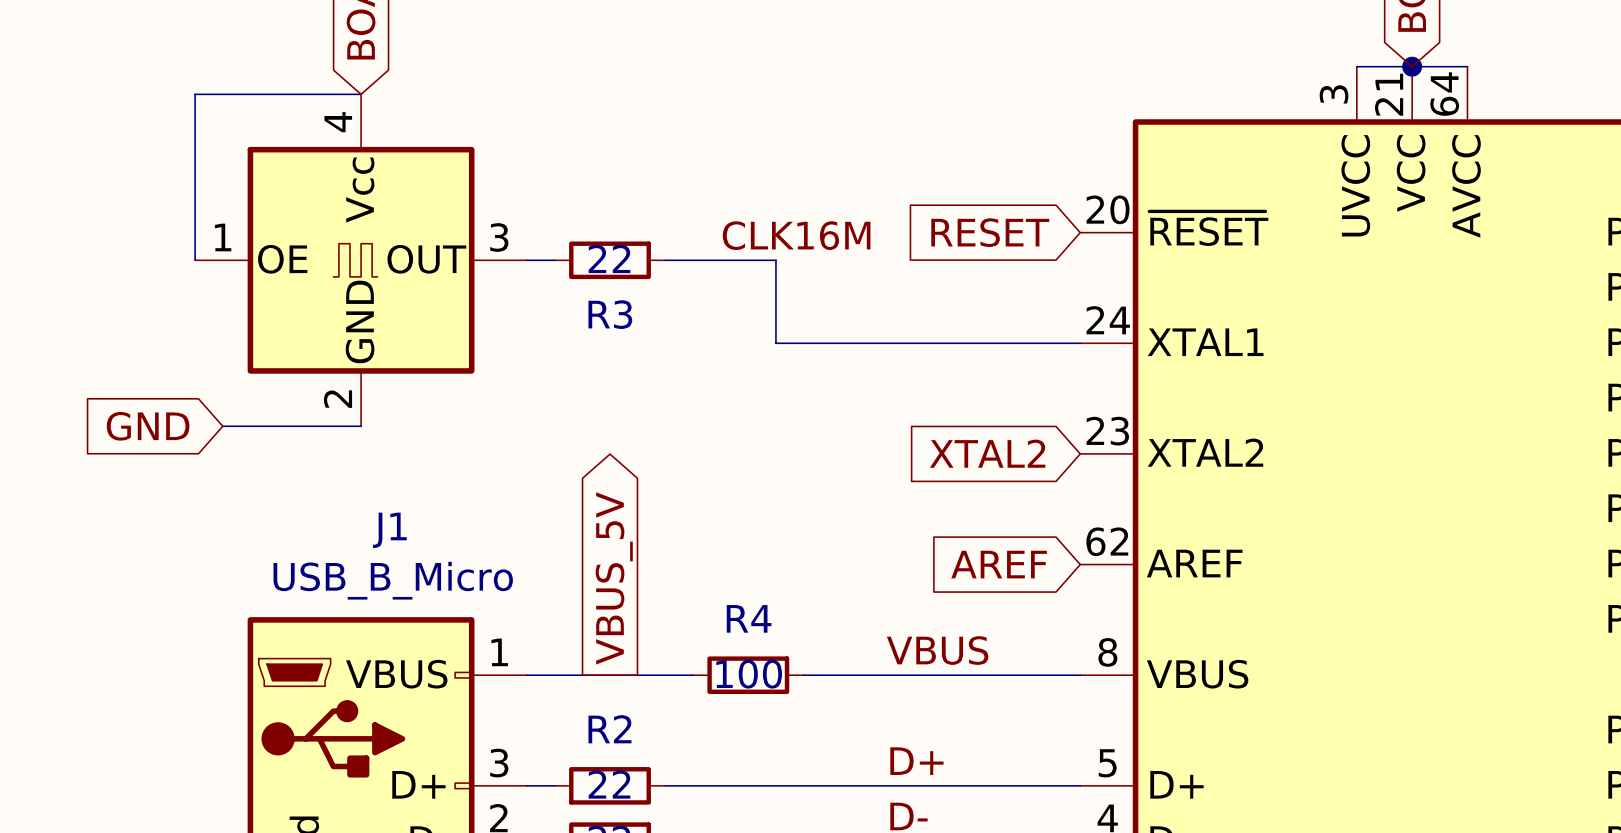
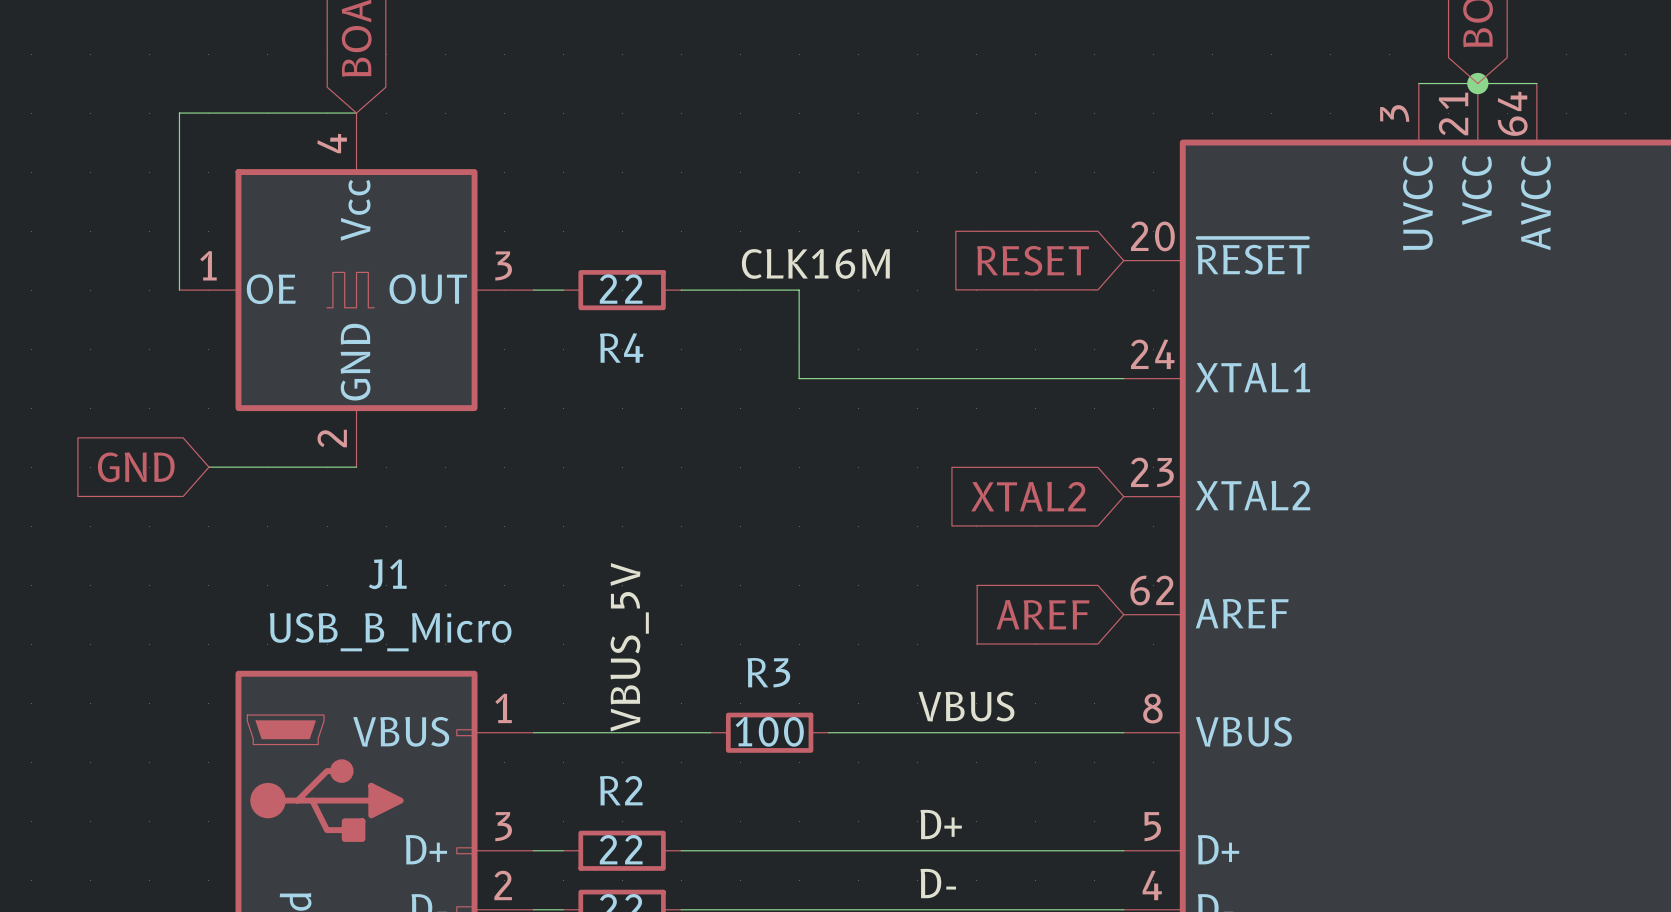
R3 name: R3 (610, 314) -> R4 (621, 348)
global label: VBUS_5V (614, 578) -> none
label: none -> VBUS_5V (629, 647)
R4 name: R4 (749, 618) -> R3 (768, 672)

